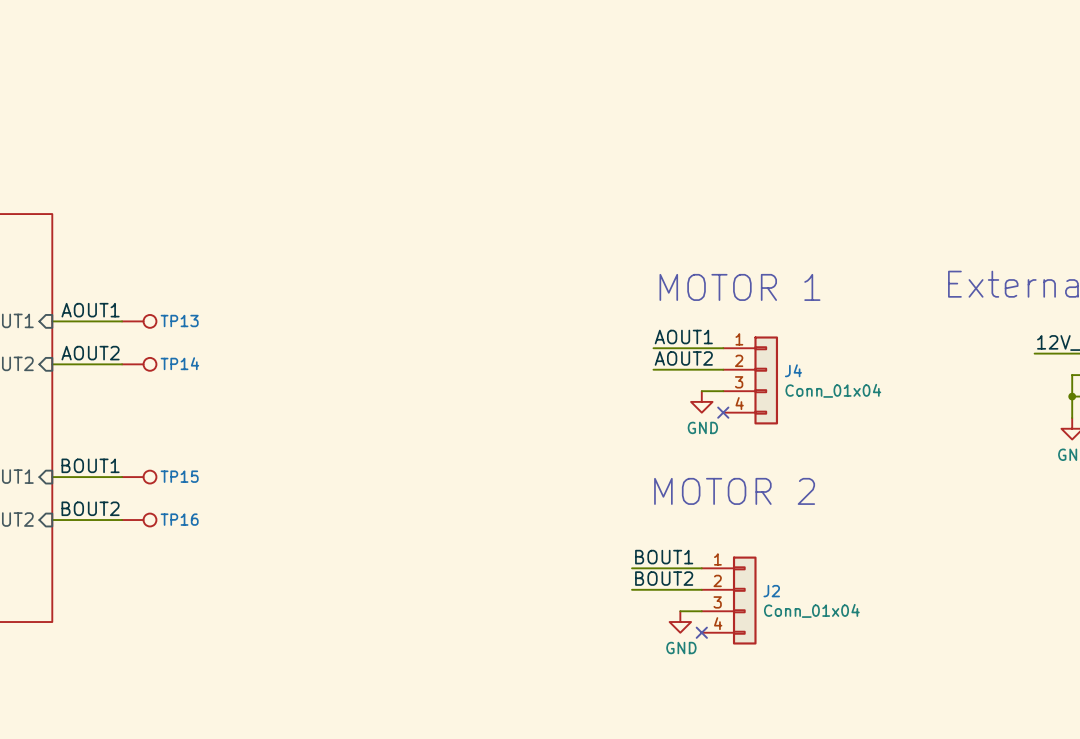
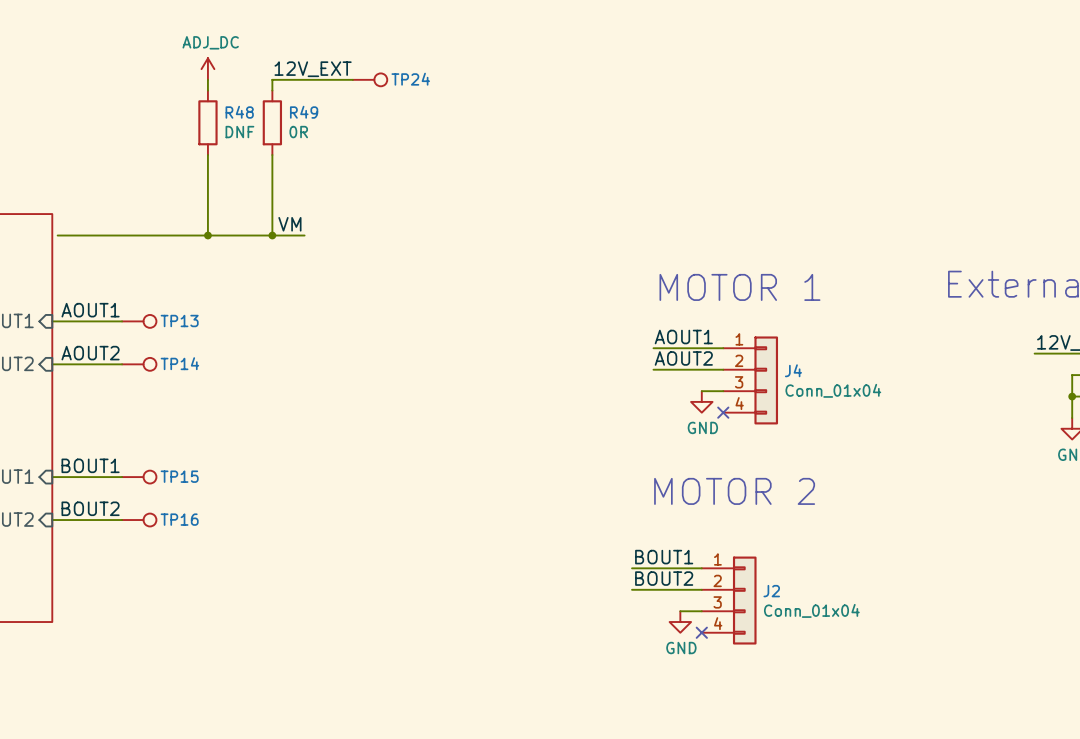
power symbol: none -> ADJ_DC (207, 69)
label: none -> 12V_EXT (313, 69)
wire: none -> (207, 79) (207, 90)
wire: none -> (352, 79) (272, 79) (272, 90)
TP24: none -> (370, 79)
R48: none -> DNF (207, 122)
R49: none -> 0R (272, 122)
wire: none -> (207, 155) (207, 235)
wire: none -> (272, 155) (272, 235)
label: none -> VM (289, 224)
wire: none -> (57, 235) (304, 235)
junction: none -> (207, 235)
junction: none -> (272, 235)

